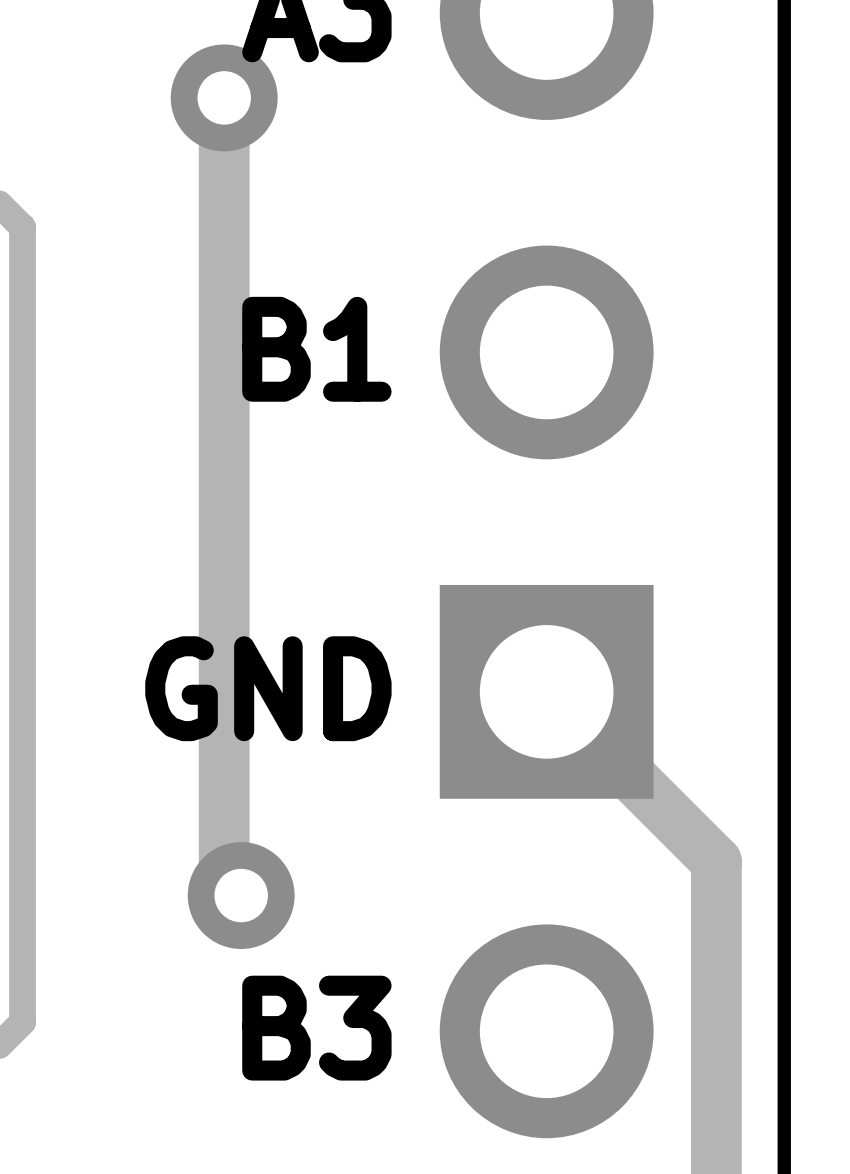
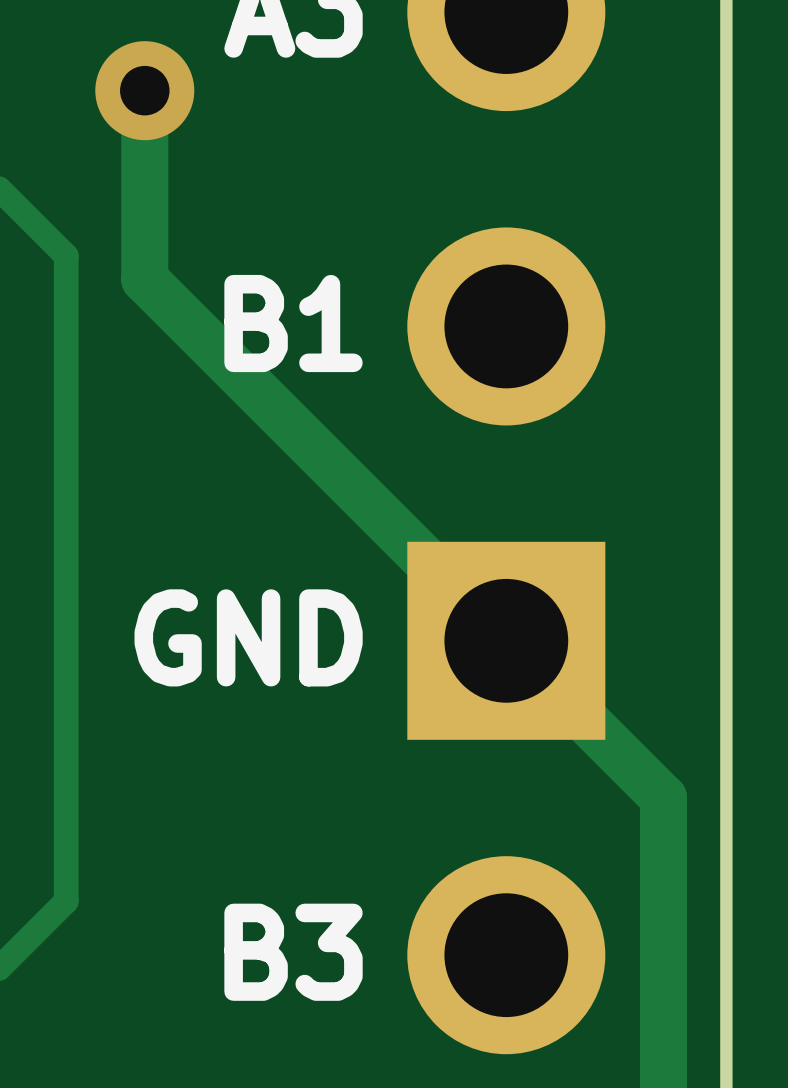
track: none -> (144, 90) (144, 279) (506, 640)
track: (224, 97) (224, 878) (241, 895) -> none
via position: (224, 97) -> (144, 90)
track: (22, 227) (22, 1022) -> (20, 210) (66, 255) (66, 901) (20, 946)
via: (241, 895) -> none

